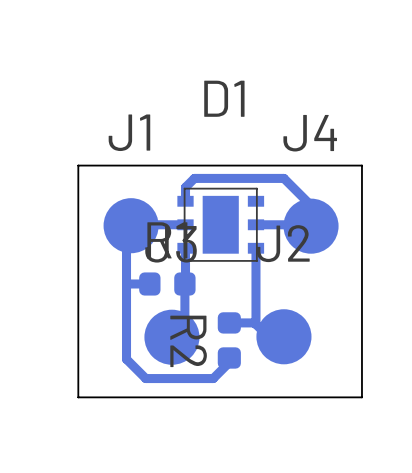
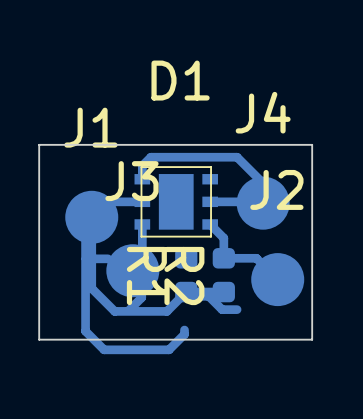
J1 position: (131, 225) -> (91, 217)
bottom track: none -> (91, 217) (91, 288) (114, 311) (166, 311) (186, 292) (223, 292)
bottom track: (255, 248) (255, 324) -> (210, 224) (223, 238) (223, 258) (256, 258) (277, 279)
R1 rotation: 0° (167, 283) -> 90° clockwise (186, 275)
R1 position: (167, 283) -> (186, 275)
J2 position: (283, 336) -> (277, 279)
J3 position: (171, 337) -> (132, 270)
R2 position: (229, 340) -> (223, 275)
board edge: (361, 367) (361, 397) (78, 397) (78, 367) -> (312, 339) (39, 339)

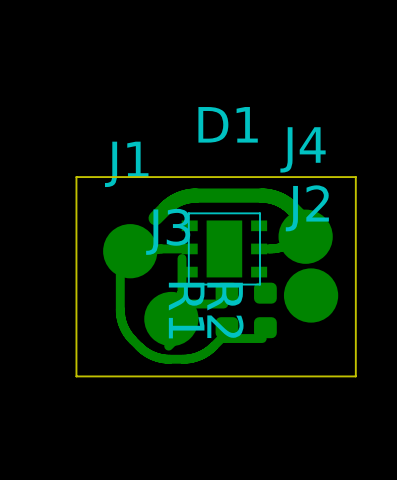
bottom track: (142, 179) (142, 165) (150, 157) (237, 157) (263, 183) (263, 203) (210, 201) -> none
bottom track: none -> (155, 218) (172, 202) (187, 196) (263, 195) (276, 198) (285, 202) (310, 226) (297, 239) (286, 245) (273, 248) (259, 248)
bottom track: (142, 201) (90, 201) (85, 207) (85, 331) (104, 349) (169, 349) (184, 334) (184, 330) -> none
D1 position: (176, 201) -> (224, 248)
bottom track: none -> (189, 248) (159, 248) (147, 251) (134, 258) (120, 272) (120, 316) (124, 328) (130, 337) (149, 354) (169, 359) (187, 359) (199, 355) (210, 349) (221, 338) (262, 338)
bottom track: (91, 217) (91, 288) (114, 311) (166, 311) (186, 292) (223, 292) -> none
bottom track: (210, 224) (223, 238) (223, 258) (256, 258) (277, 279) -> none
bottom track: (108, 258) (86, 258) -> none
bottom track: none -> (223, 304) (186, 304)
J3 position: (132, 270) -> (171, 319)
J2 position: (277, 279) -> (311, 295)
bottom track: (184, 296) (208, 296) (222, 309) (237, 309) -> none

